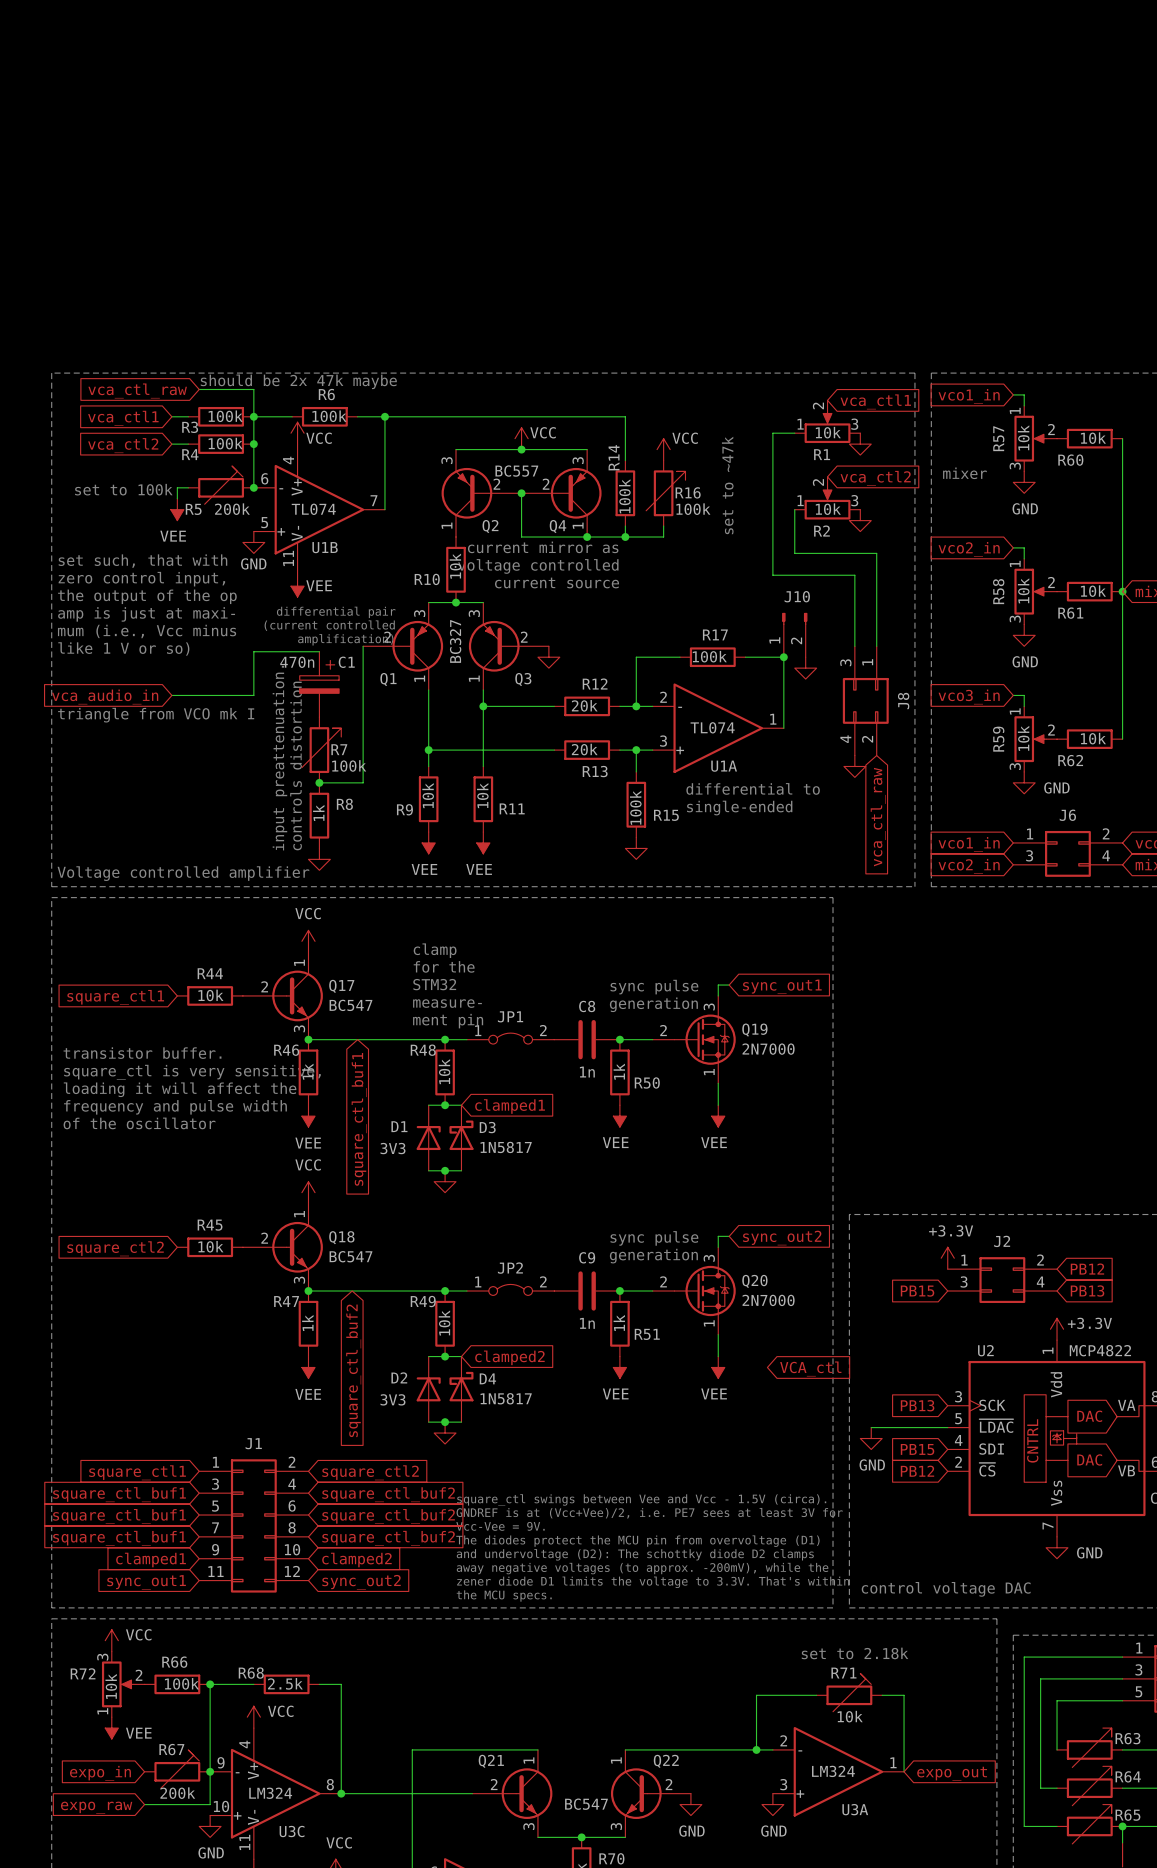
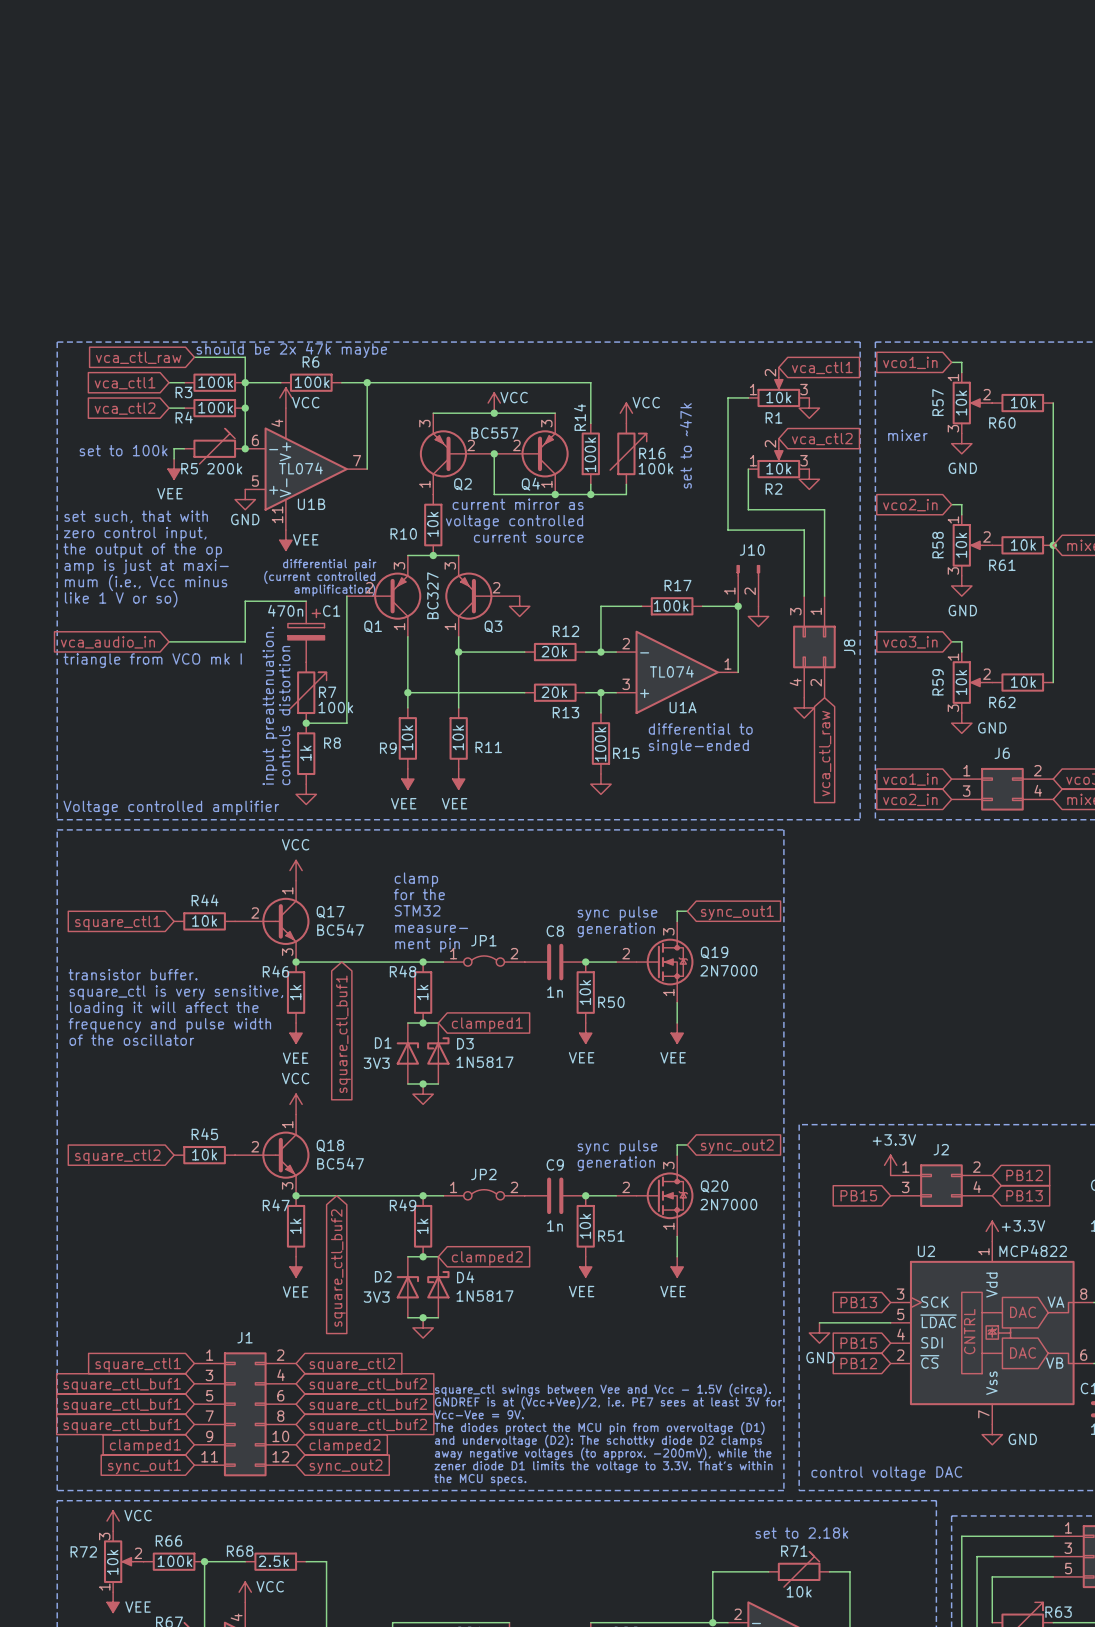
R48 value: 10k (444, 1071) -> 1k (422, 992)
R50 value: 1k (619, 1071) -> 10k (585, 992)
R49 value: 10k (444, 1322) -> 1k (422, 1226)
R51 value: 1k (619, 1322) -> 10k (585, 1226)
global label: VCA_ctl (810, 1368) -> none

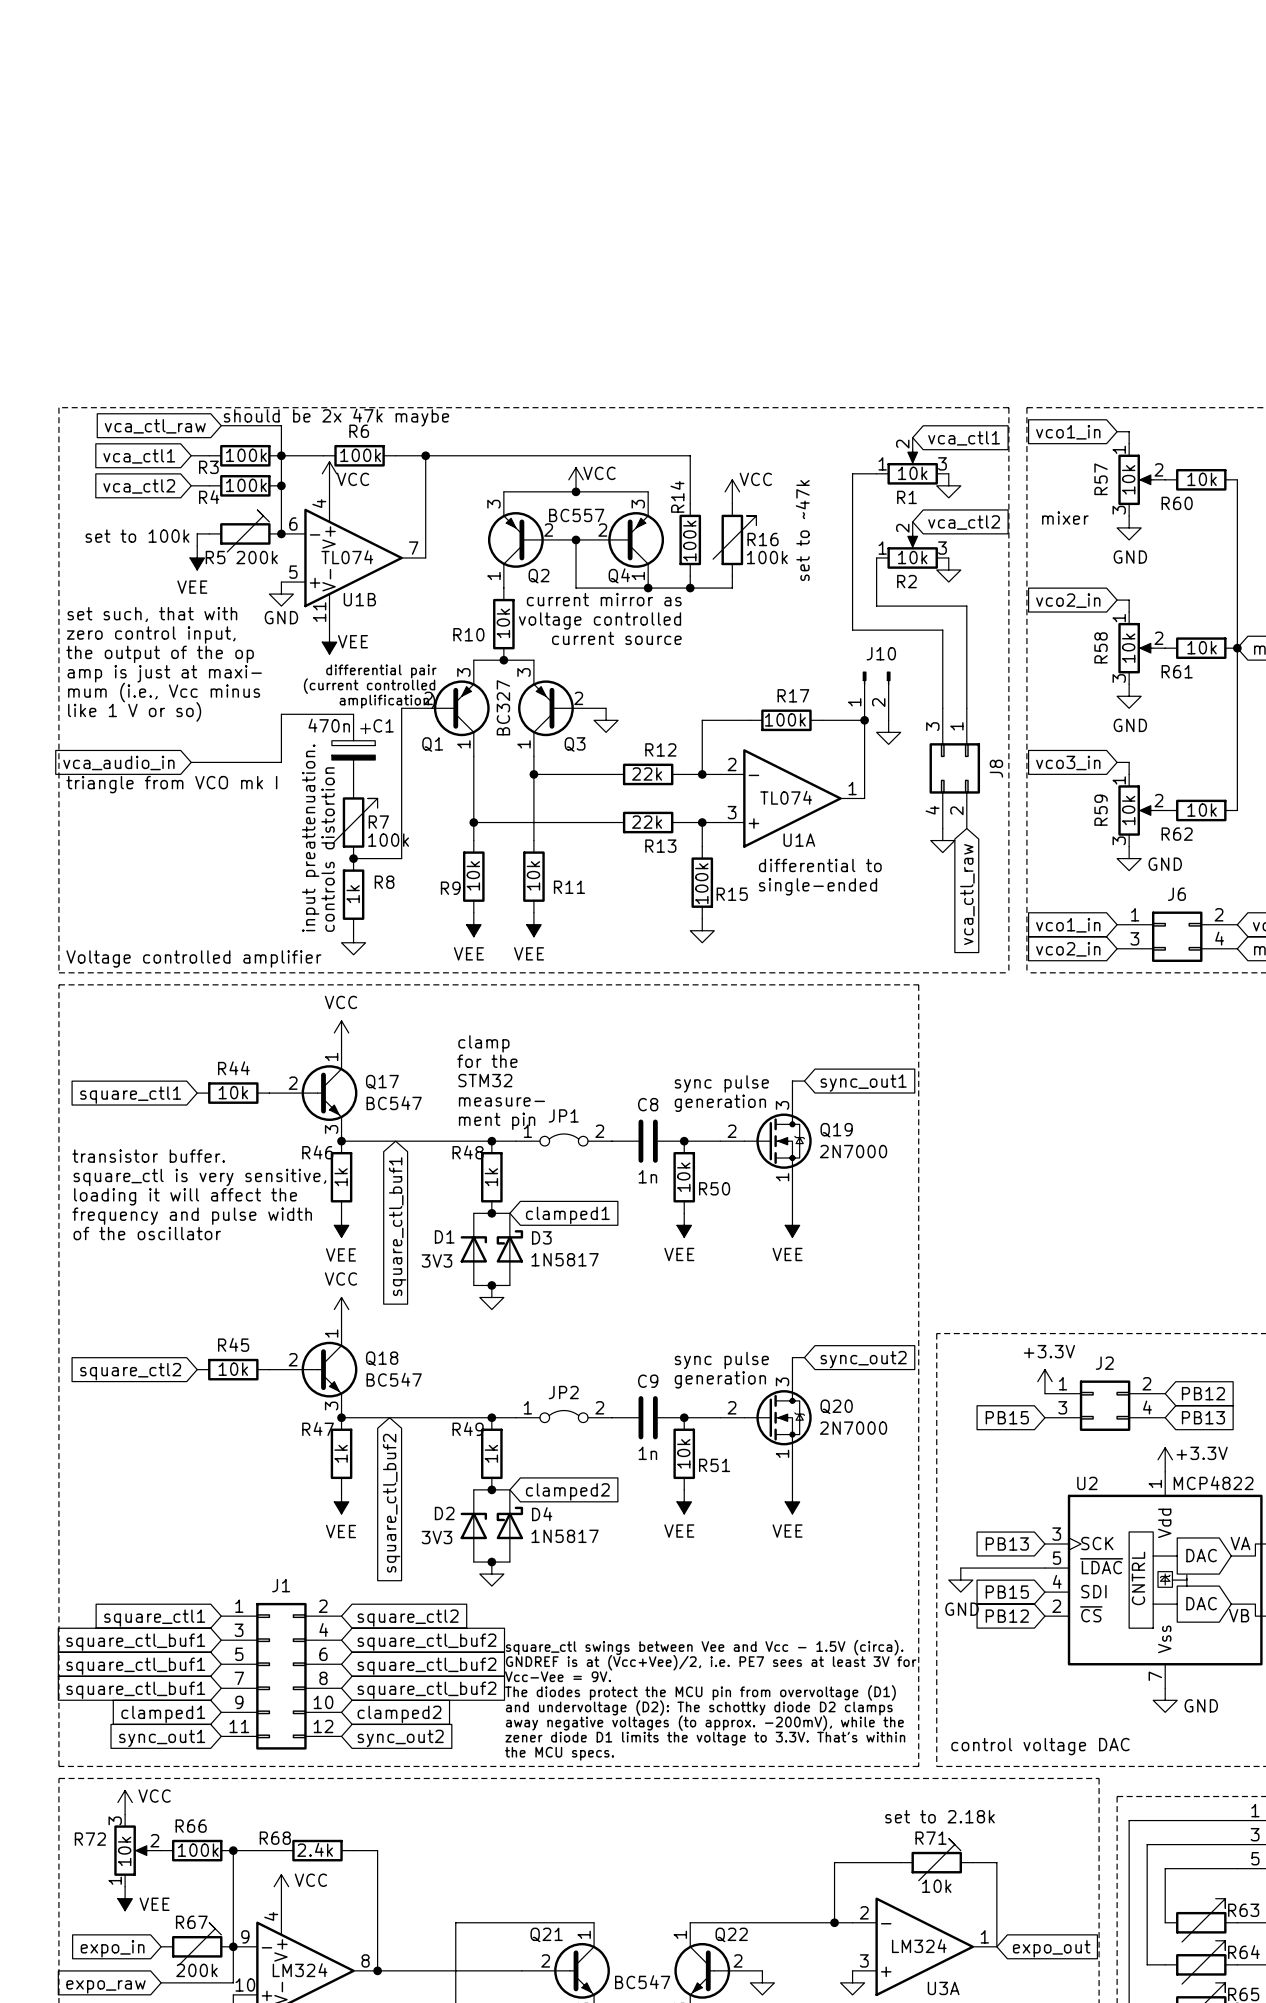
R12 value: 20k (554, 651) -> 22k (647, 773)
R13 value: 20k (554, 692) -> 22k (647, 822)
R68 value: 2.5k (273, 1561) -> 2.4k (315, 1849)

